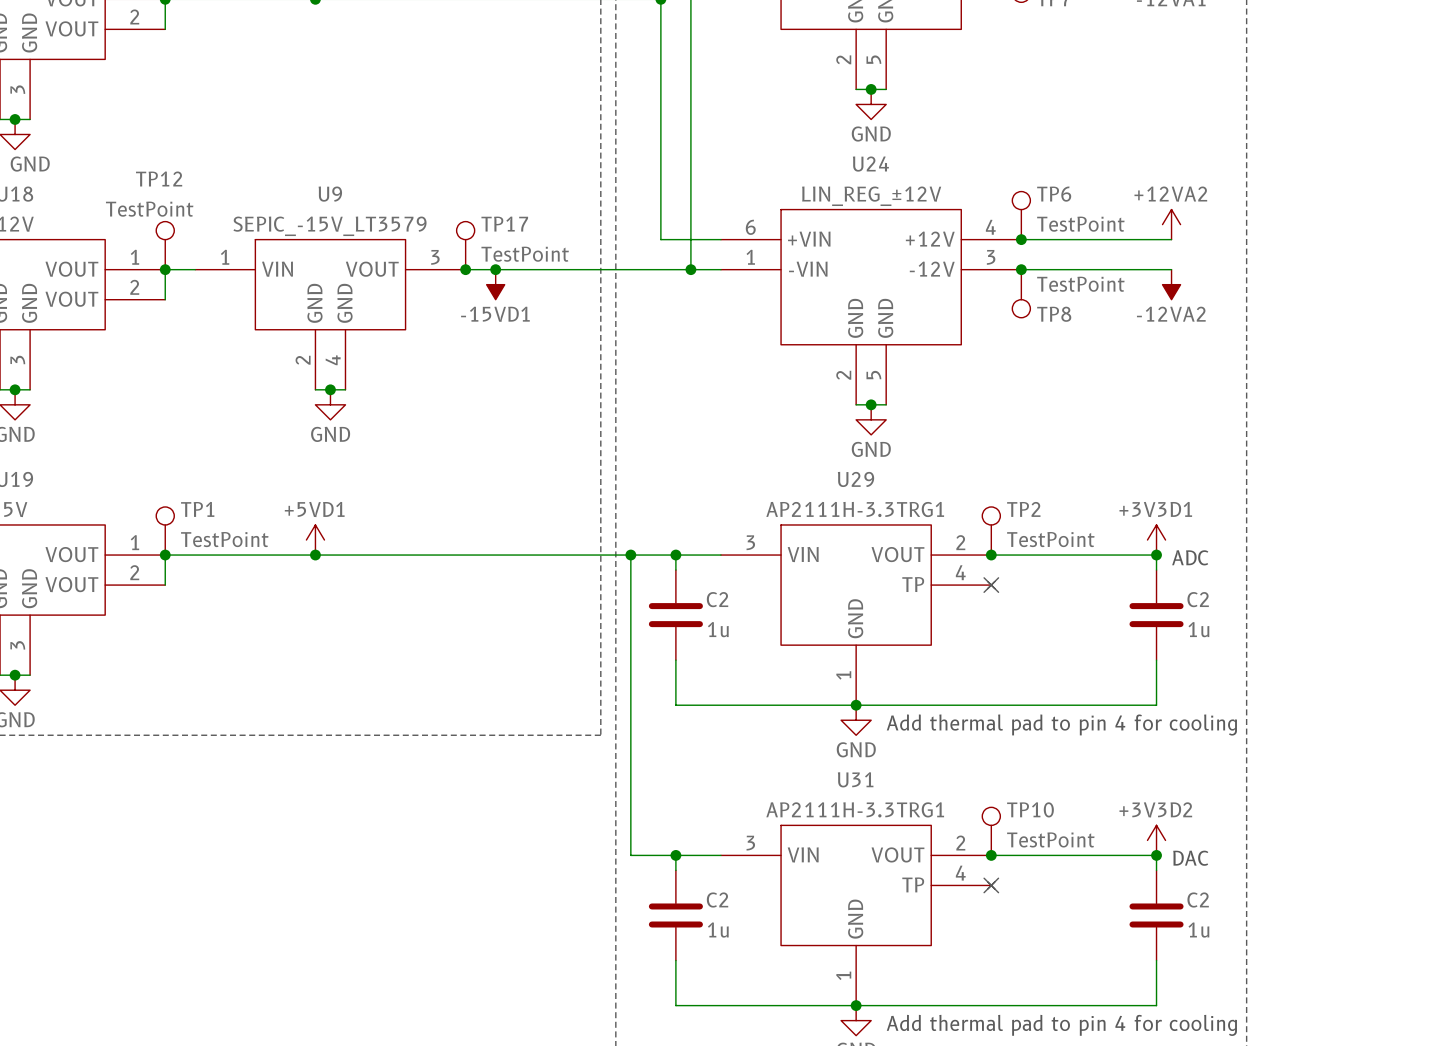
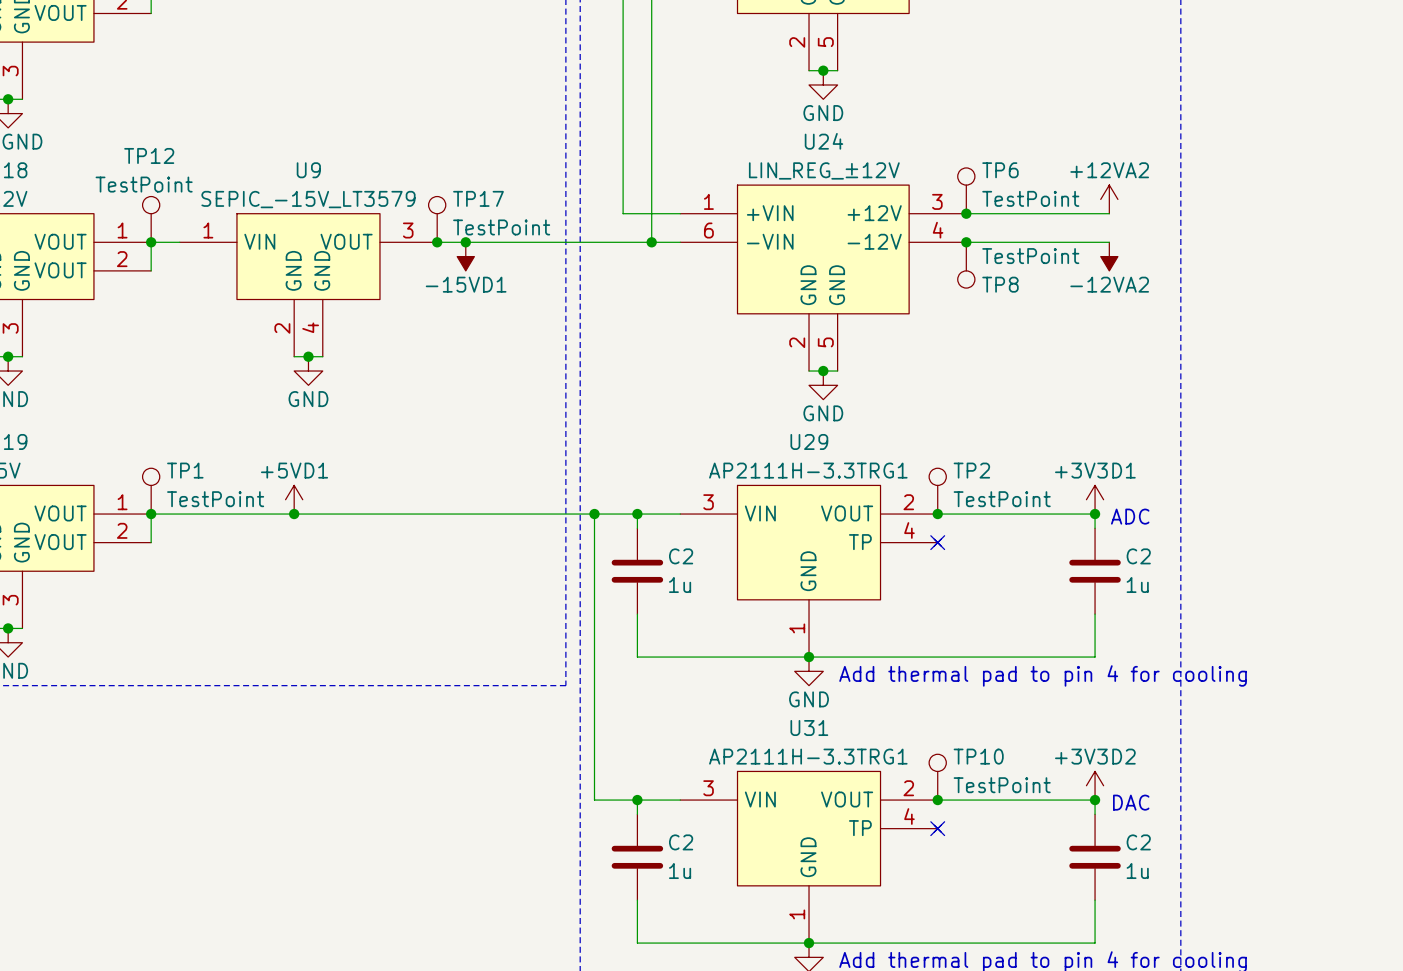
U24 pin number: 6 (750, 227) -> 1 (708, 201)
U24 pin number: 4 (990, 227) -> 3 (937, 201)
U24 pin number: 1 (750, 257) -> 6 (708, 230)
U24 pin number: 3 (991, 257) -> 4 (938, 230)

